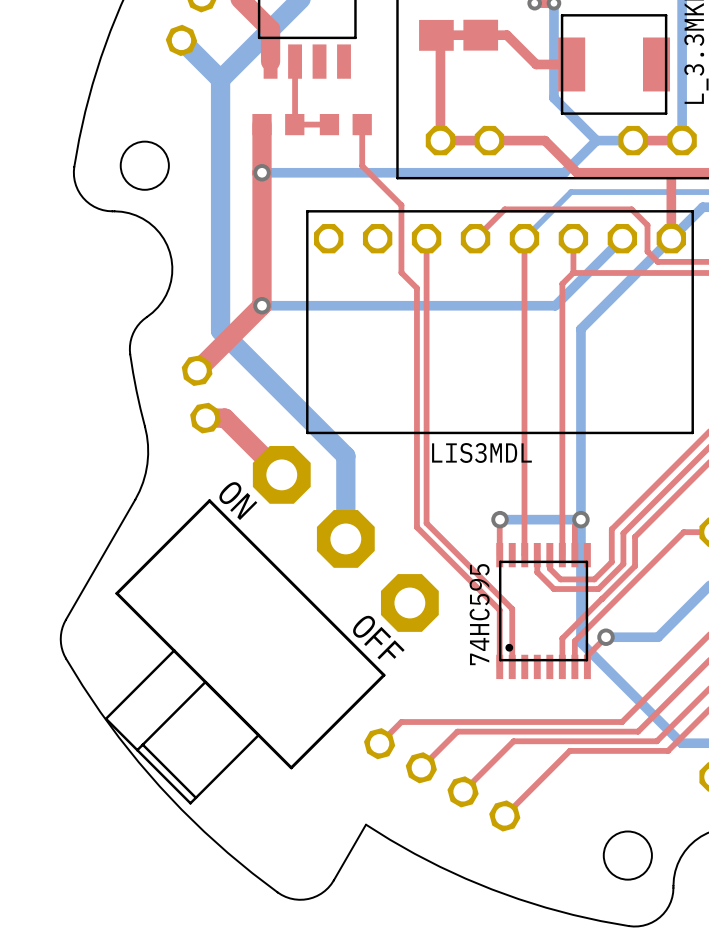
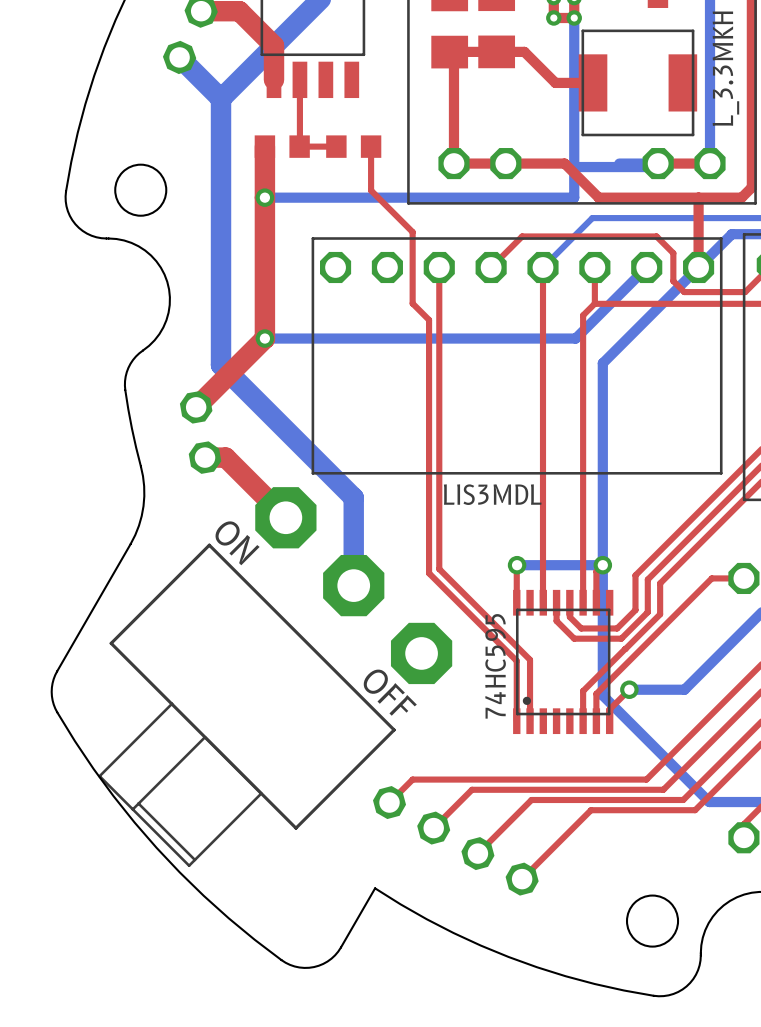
bottom track: (553, 98) (596, 140) (564, 172) (553, 172) -> (574, 118) (574, 197)
bottom track: none -> (658, 166) (574, 167)

